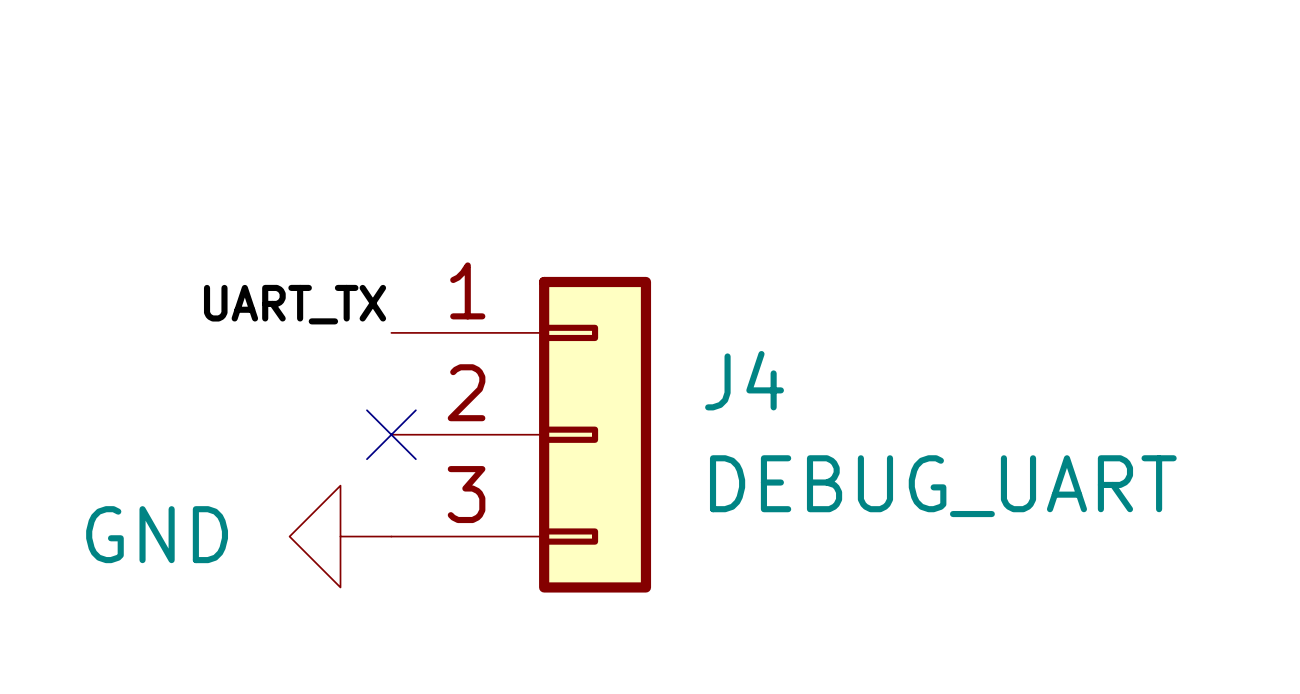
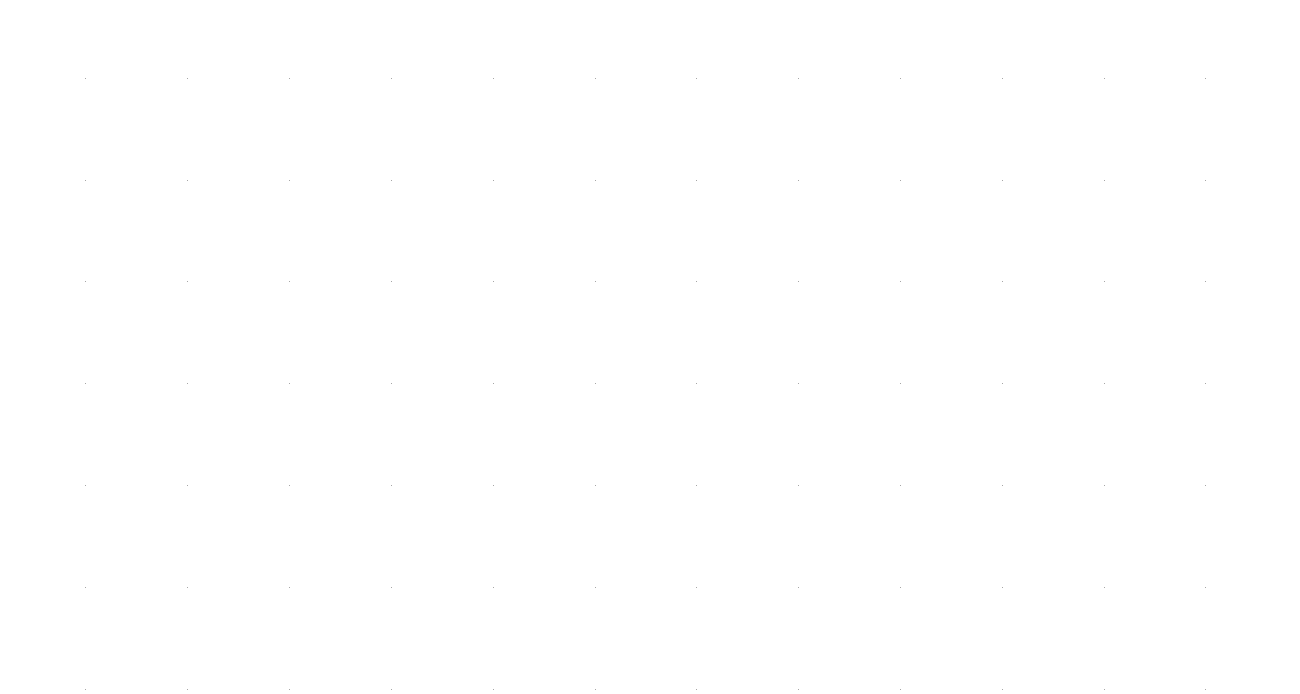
label: UART_TX (295, 304) -> none
no-connect mark: (391, 434) -> none
J4: DEBUG_UART (521, 434) -> none
power symbol: GND (340, 536) -> none

